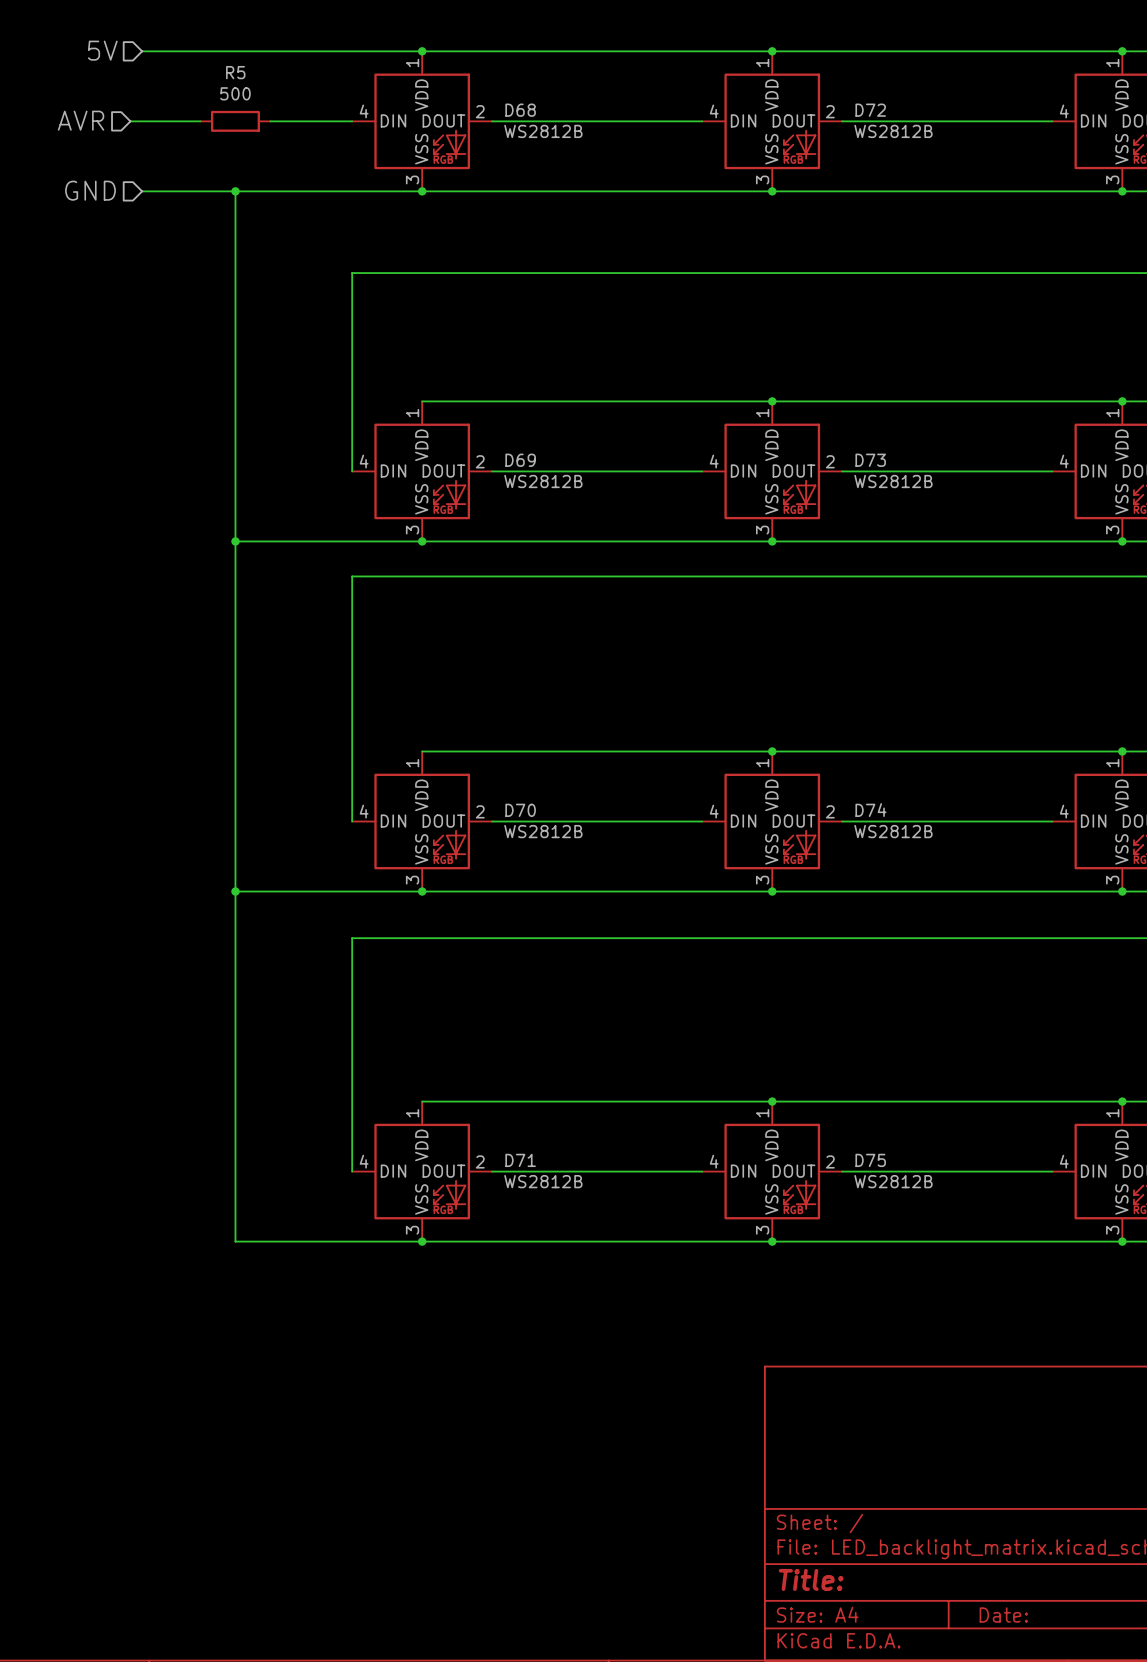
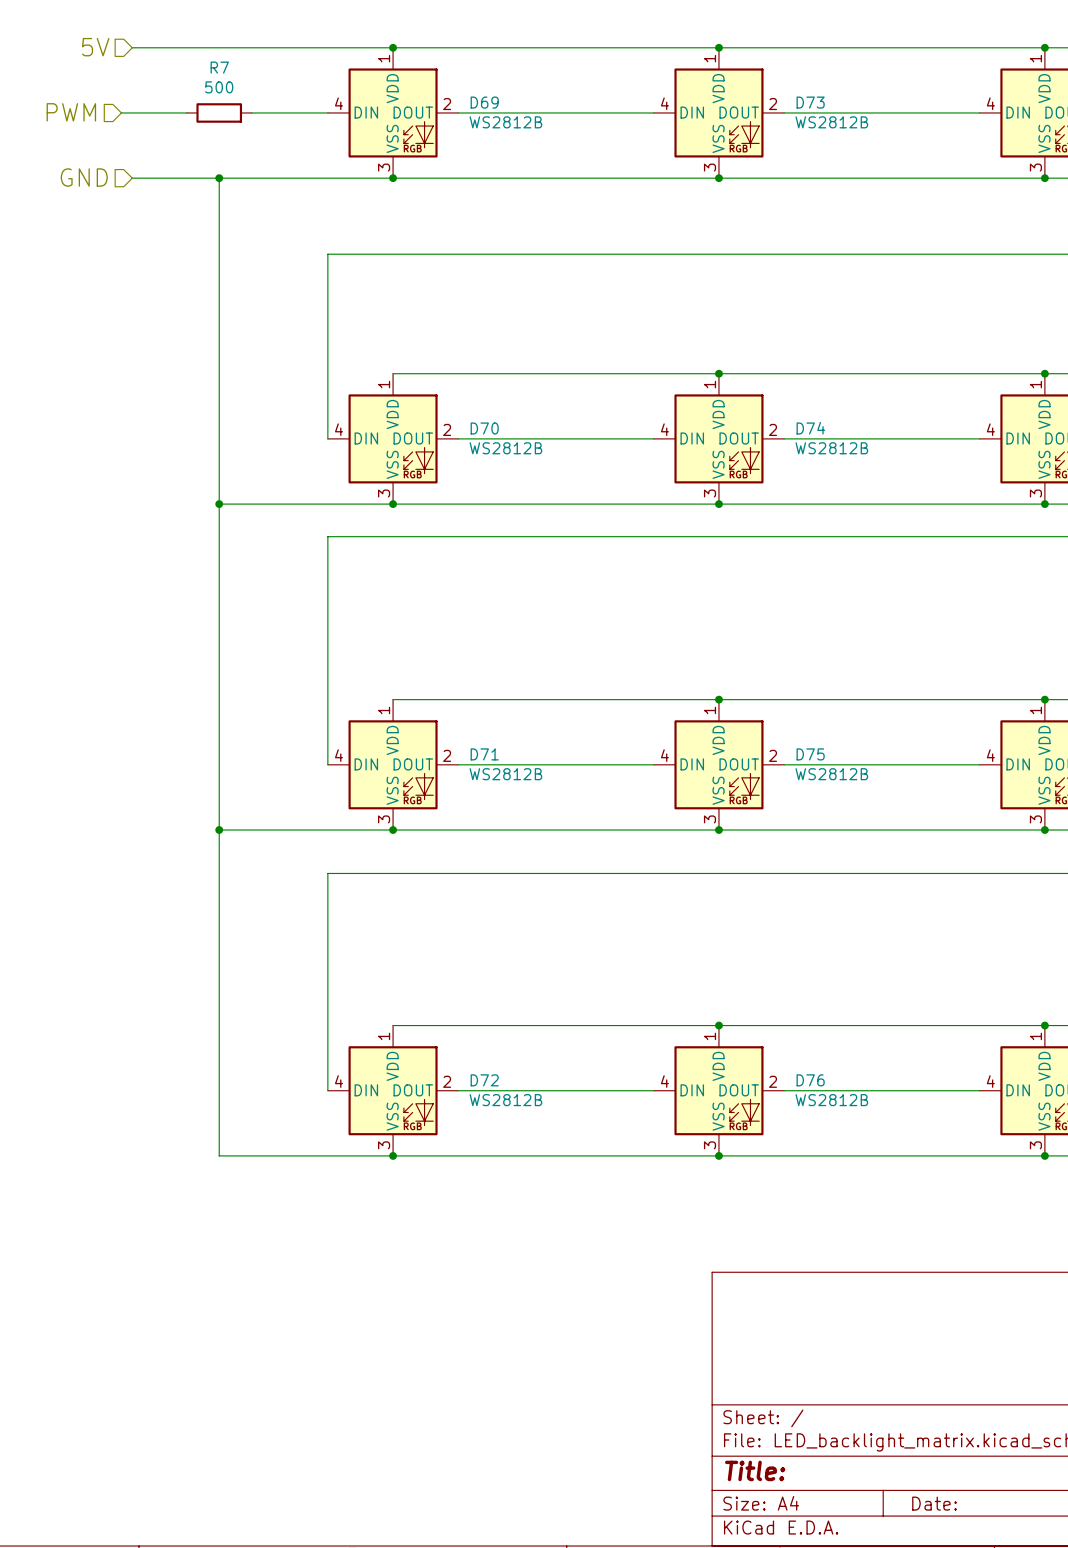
R5 name: R5 (235, 72) -> R7 (219, 67)
D68 name: D68 (520, 110) -> D69 (484, 102)
D72 name: D72 (870, 110) -> D73 (810, 102)
hierarchical label: AVR (81, 120) -> PWM (71, 112)
D69 name: D69 (520, 460) -> D70 (484, 428)
D73 name: D73 (870, 460) -> D74 (810, 428)
D70 name: D70 (520, 810) -> D71 (484, 754)
D74 name: D74 (870, 810) -> D75 (810, 754)
D71 name: D71 (520, 1160) -> D72 (484, 1080)
D75 name: D75 (870, 1160) -> D76 (810, 1080)

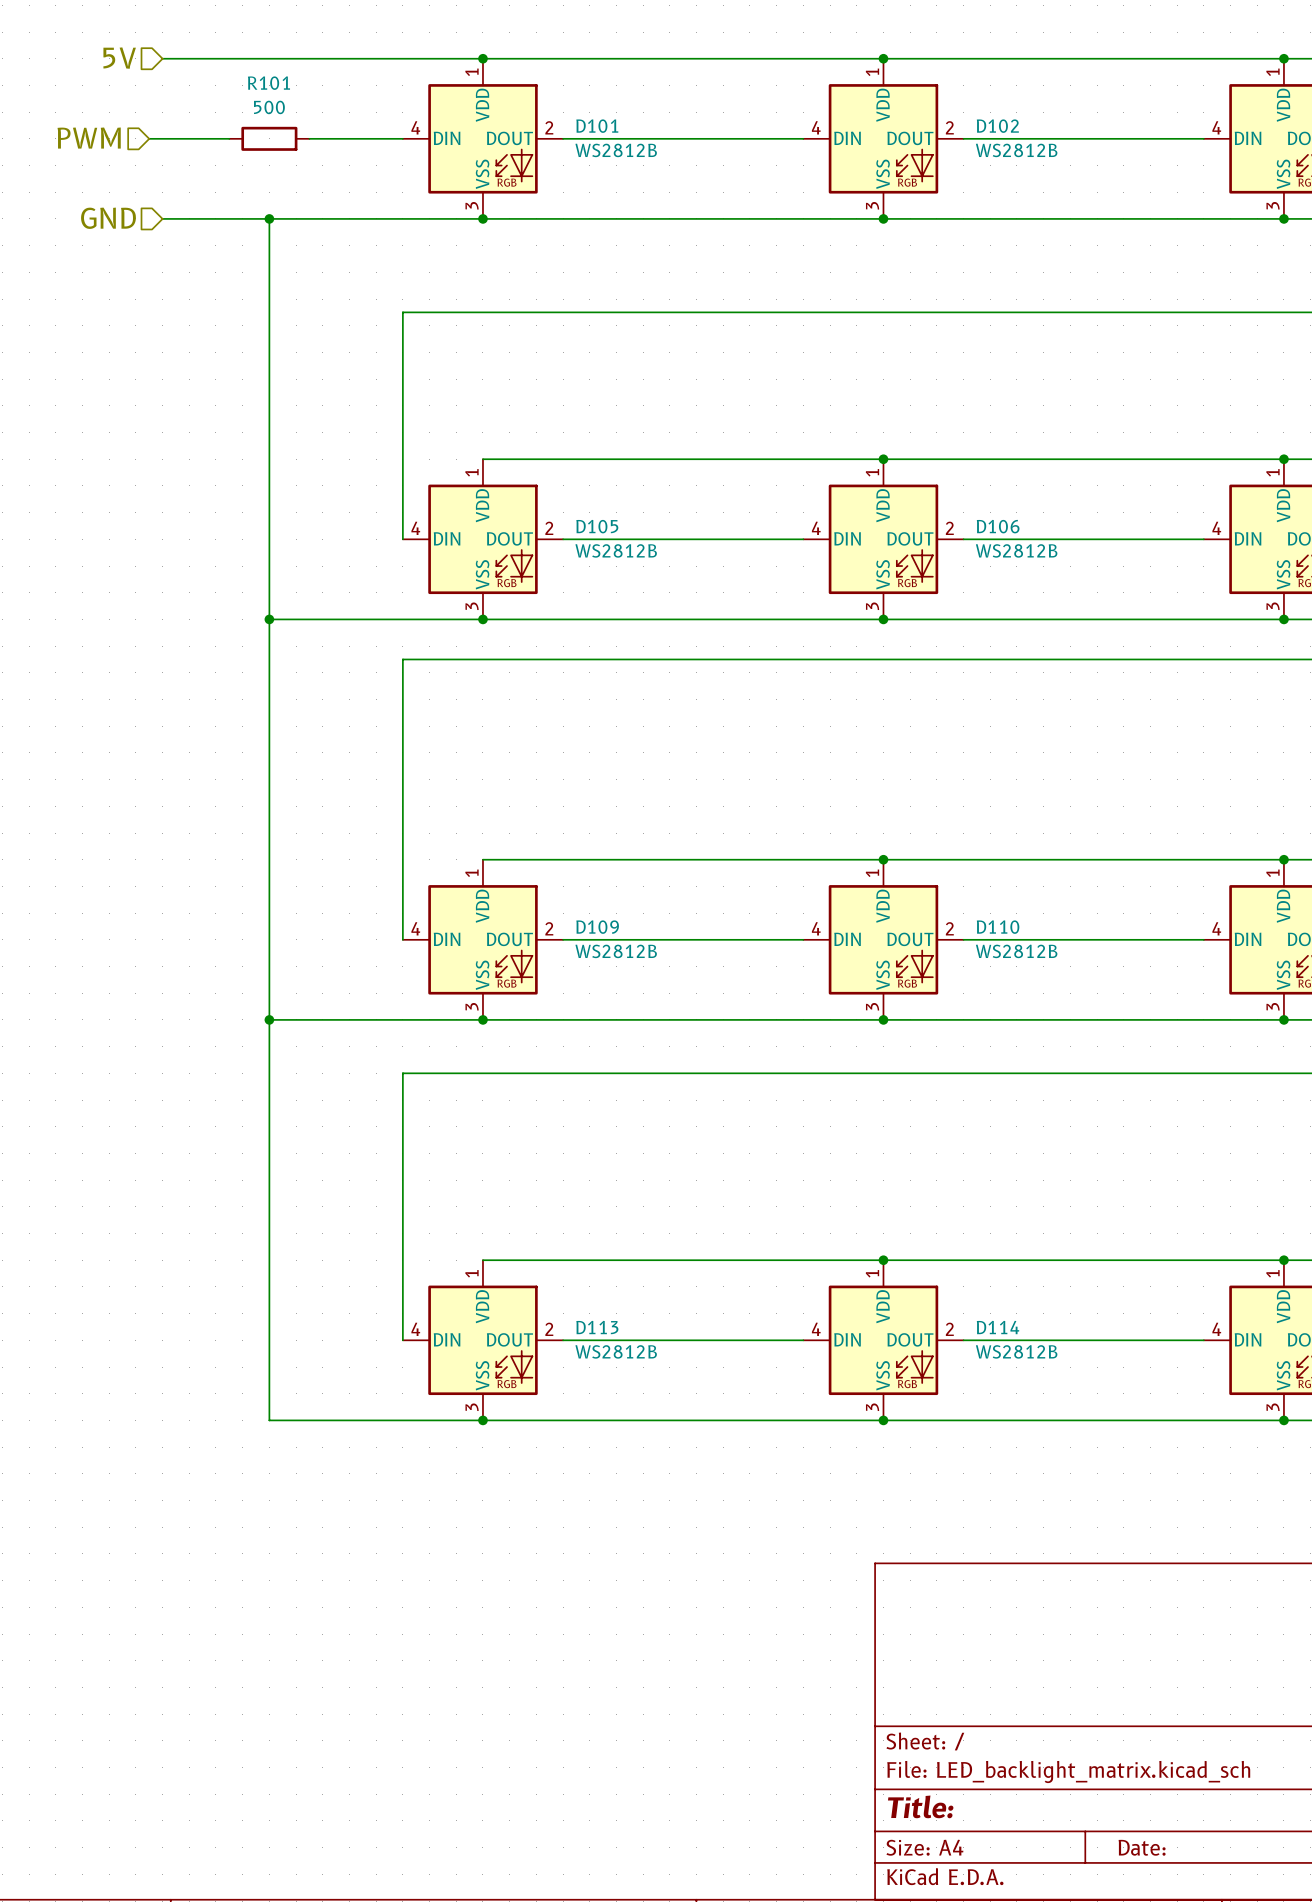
R7 name: R7 (219, 67) -> R101 (268, 83)
D69 name: D69 (484, 102) -> D101 (597, 126)
D73 name: D73 (810, 102) -> D102 (997, 126)
D70 name: D70 (484, 428) -> D105 (597, 526)
D74 name: D74 (810, 428) -> D106 (998, 526)
D71 name: D71 (484, 754) -> D109 (597, 927)
D75 name: D75 (810, 754) -> D110 (998, 927)
D72 name: D72 (484, 1080) -> D113 (597, 1327)
D76 name: D76 (810, 1080) -> D114 (998, 1327)

